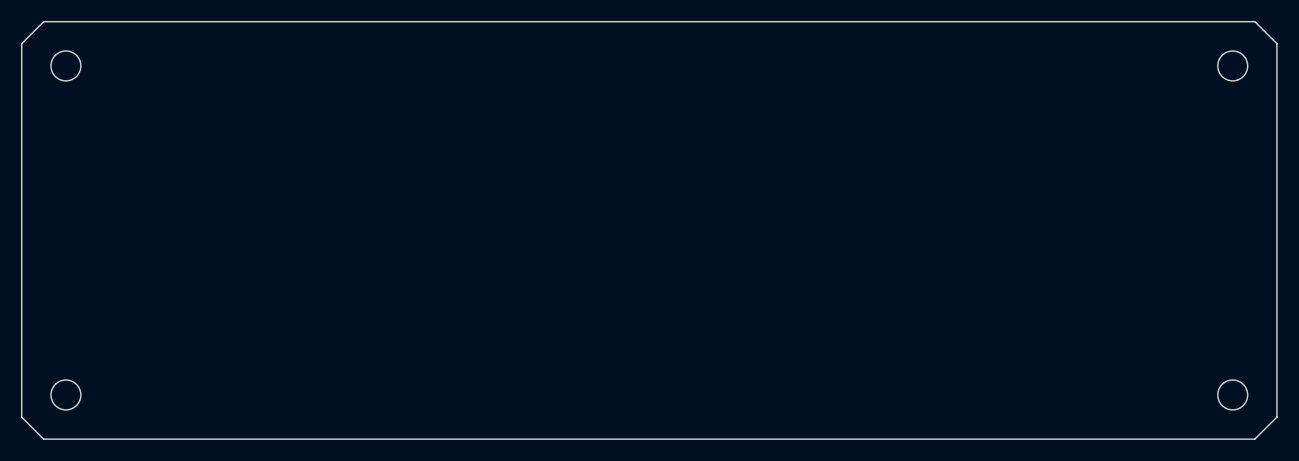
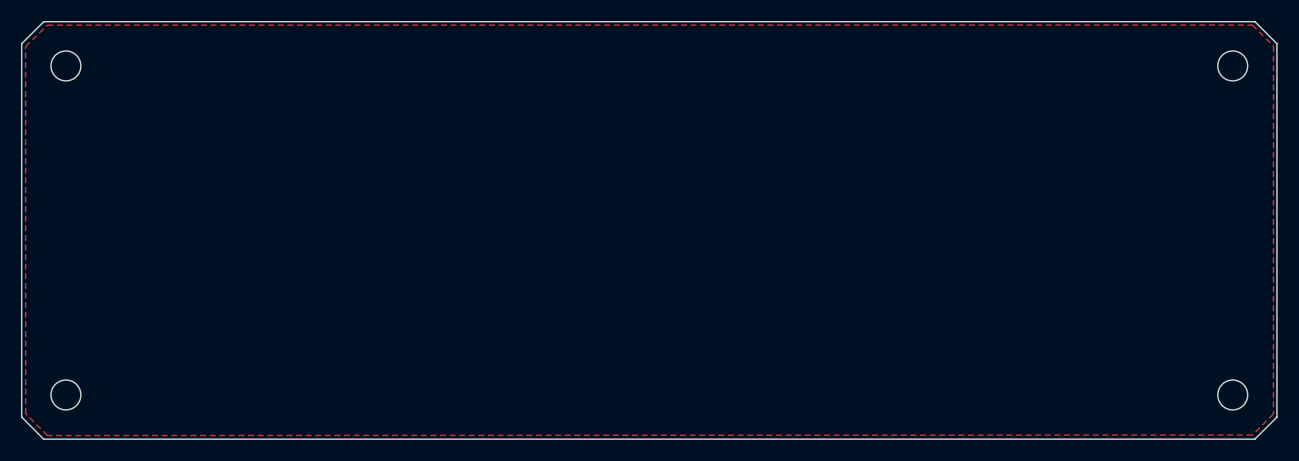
zone outline: none -> (1252, 25) (47, 25) (25, 46) (25, 413) (47, 435) (1252, 435) (1273, 414) (1273, 46) (1252, 25)

